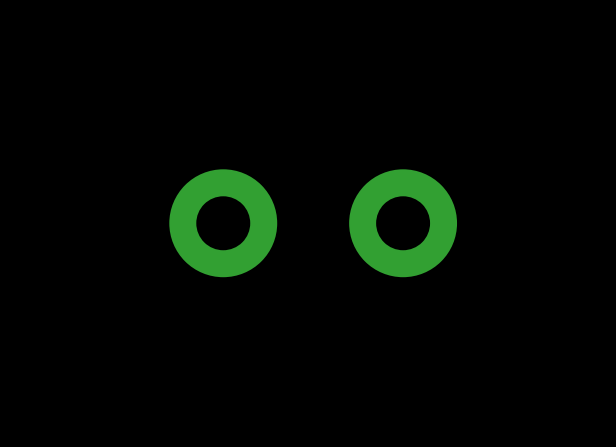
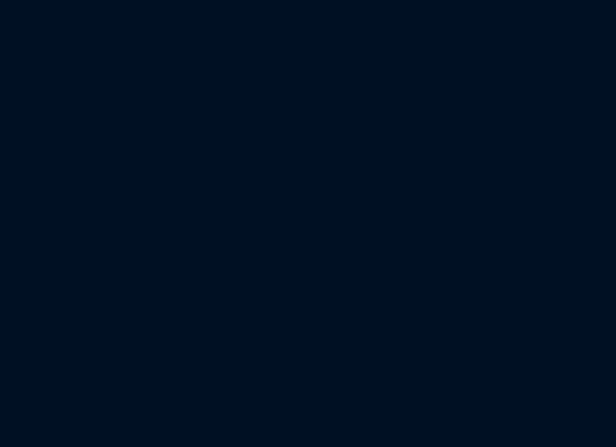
part: (313, 223) -> none

